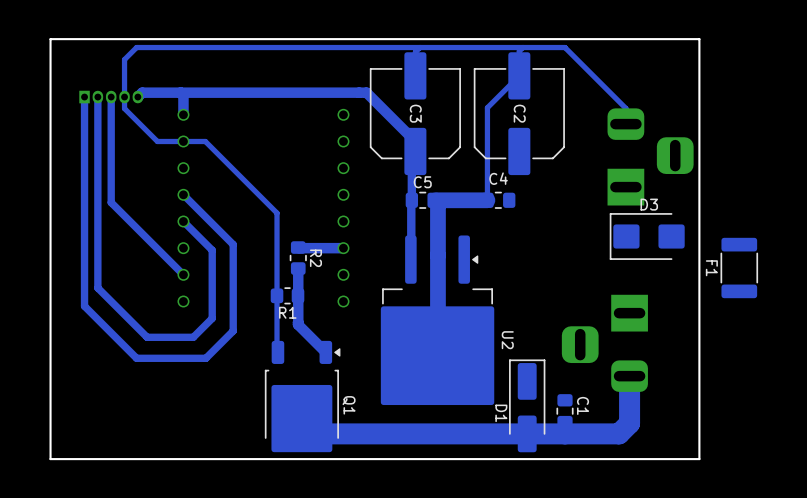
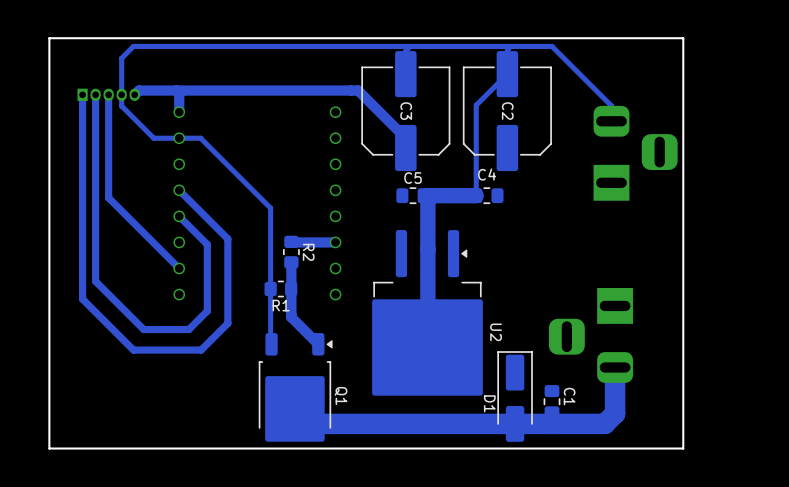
track: (415, 151) (411, 155) (411, 255) -> none
D3: (647, 236) -> none
F1: (739, 268) -> none

